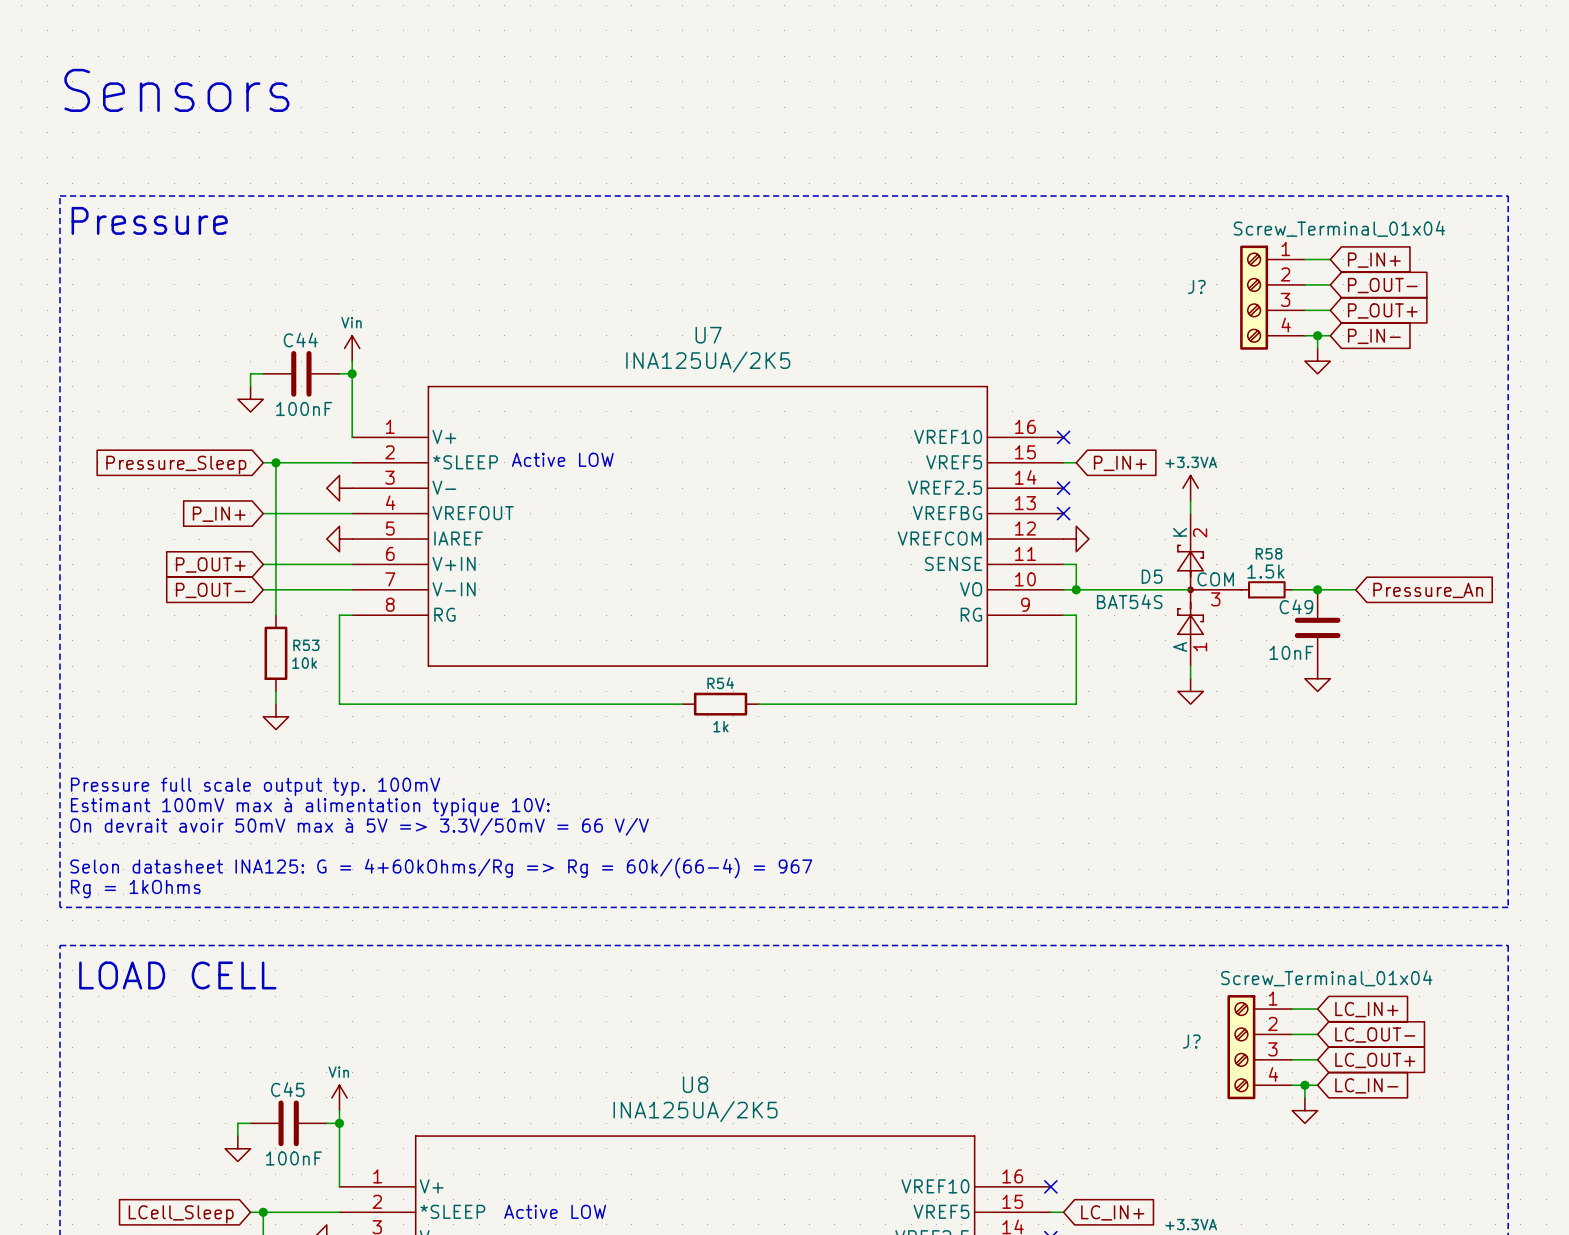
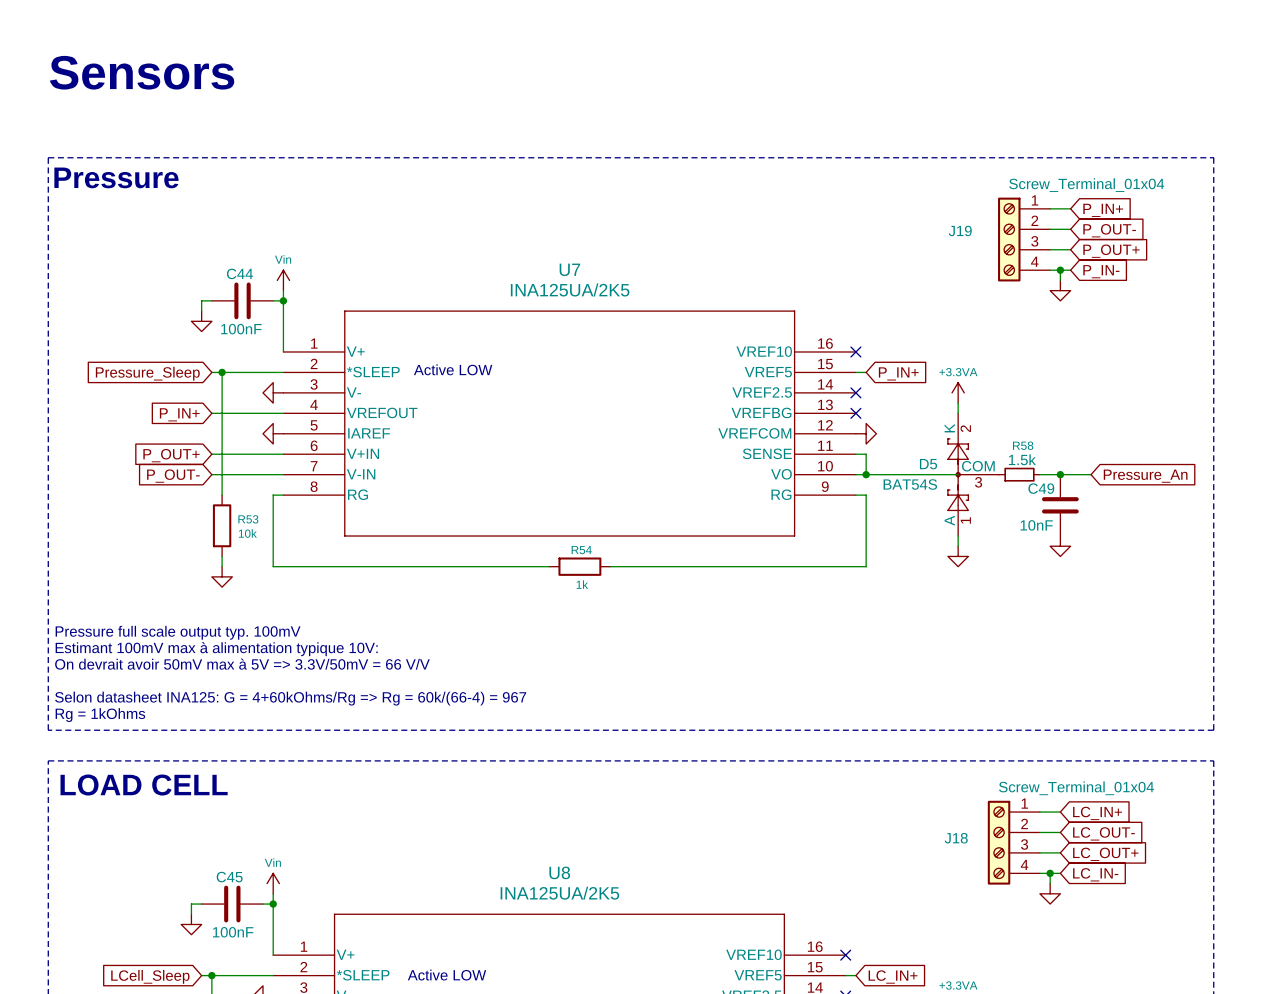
J? name: J? (1196, 287) -> J19 (960, 230)
J? name: J? (1191, 1041) -> J18 (956, 838)

